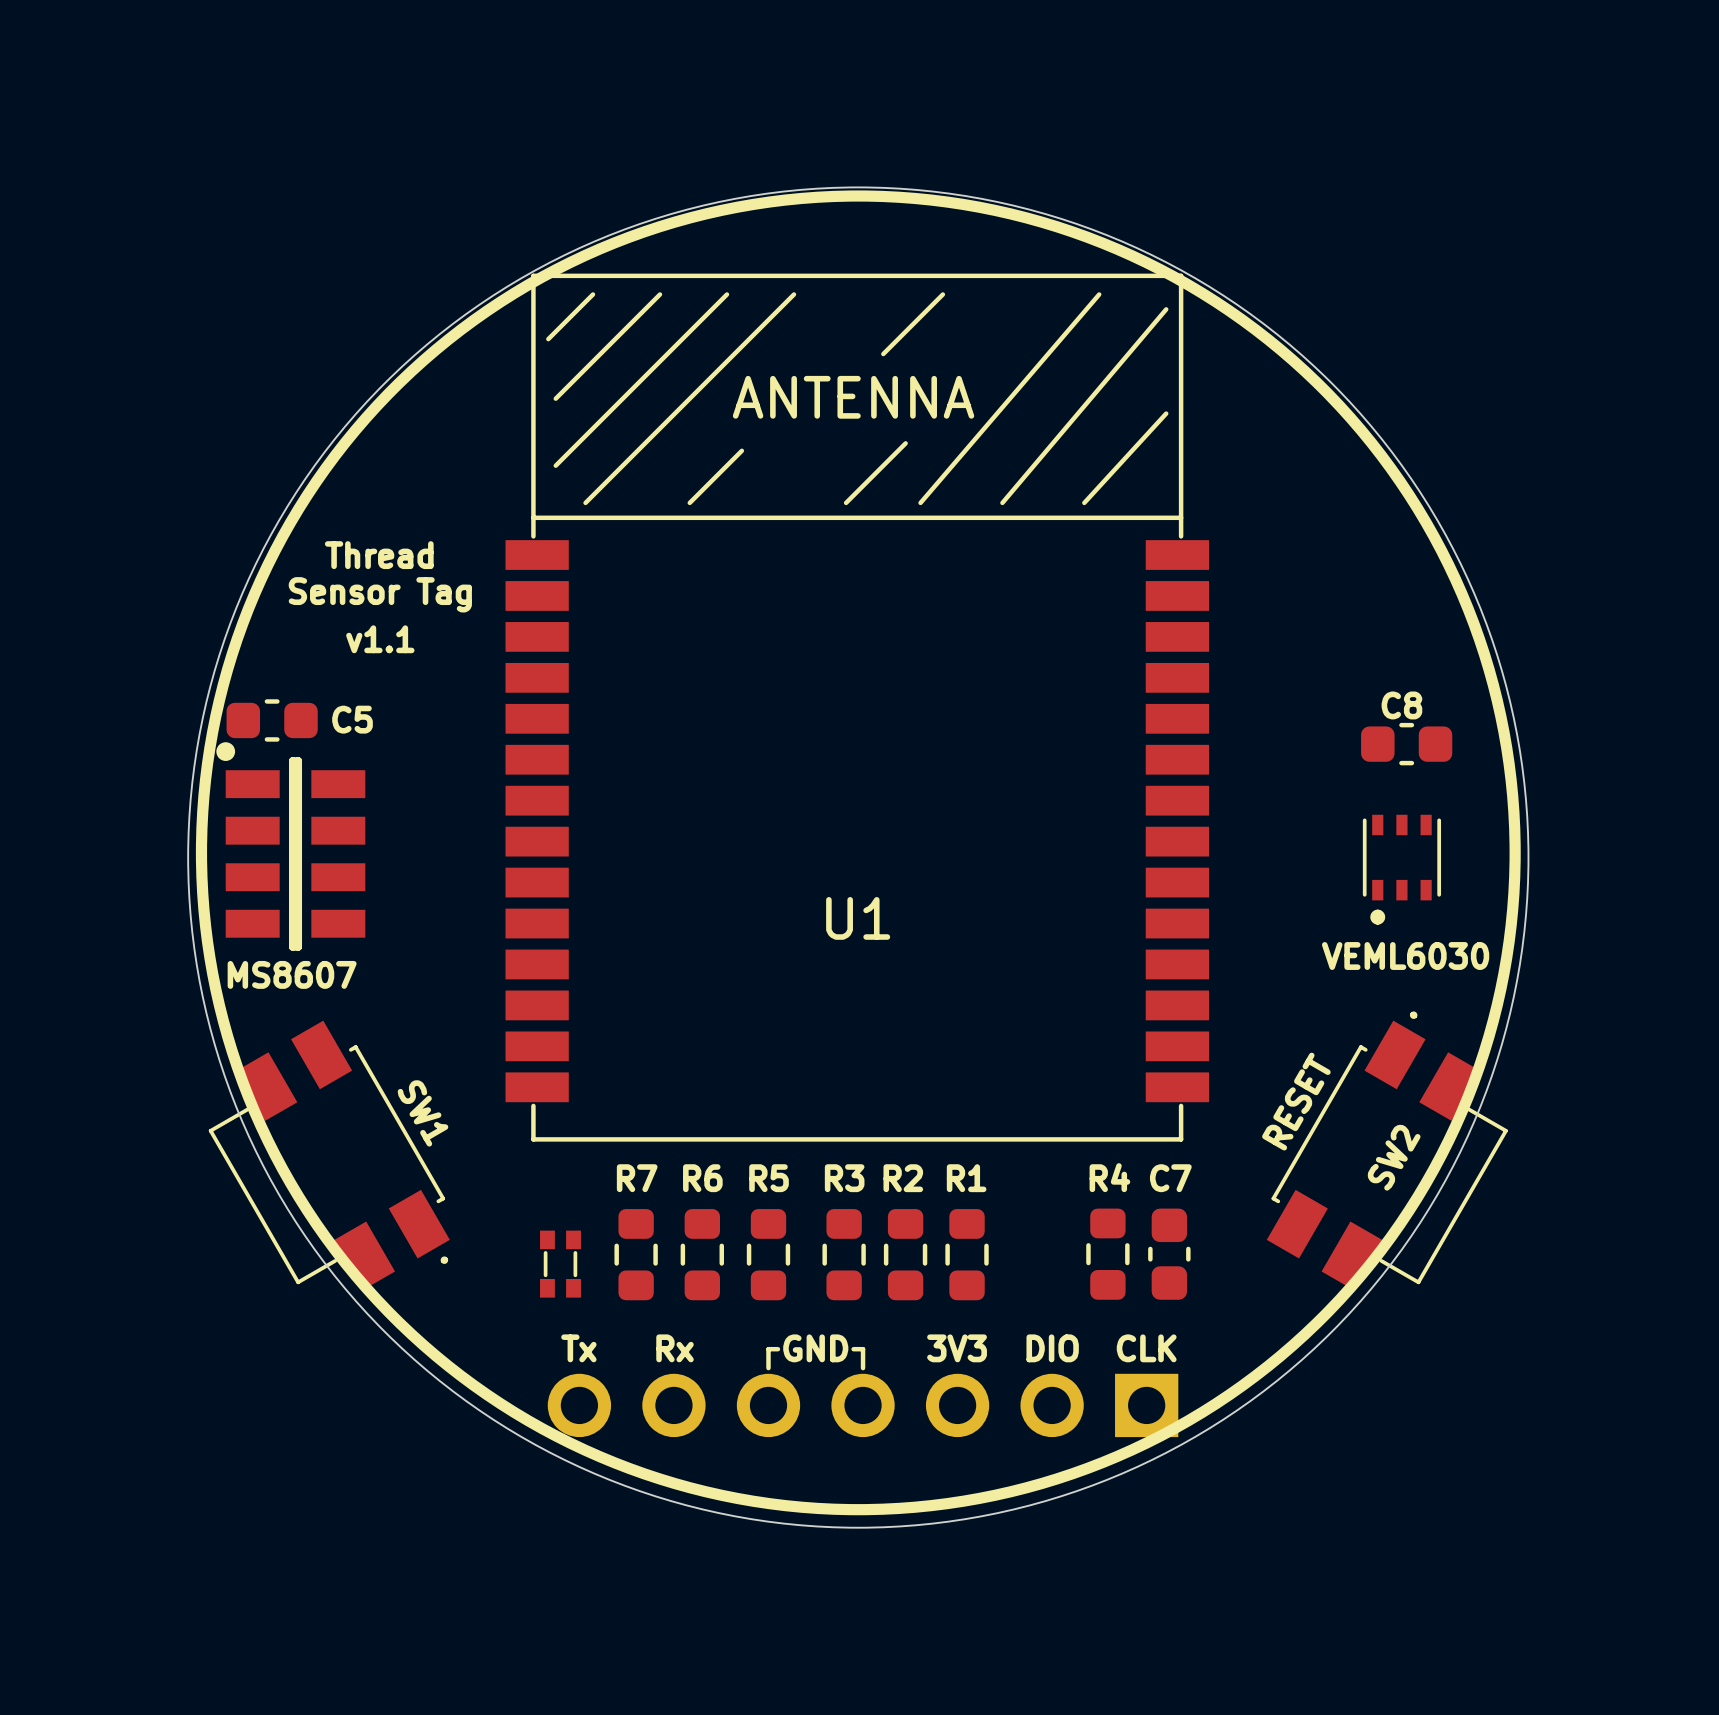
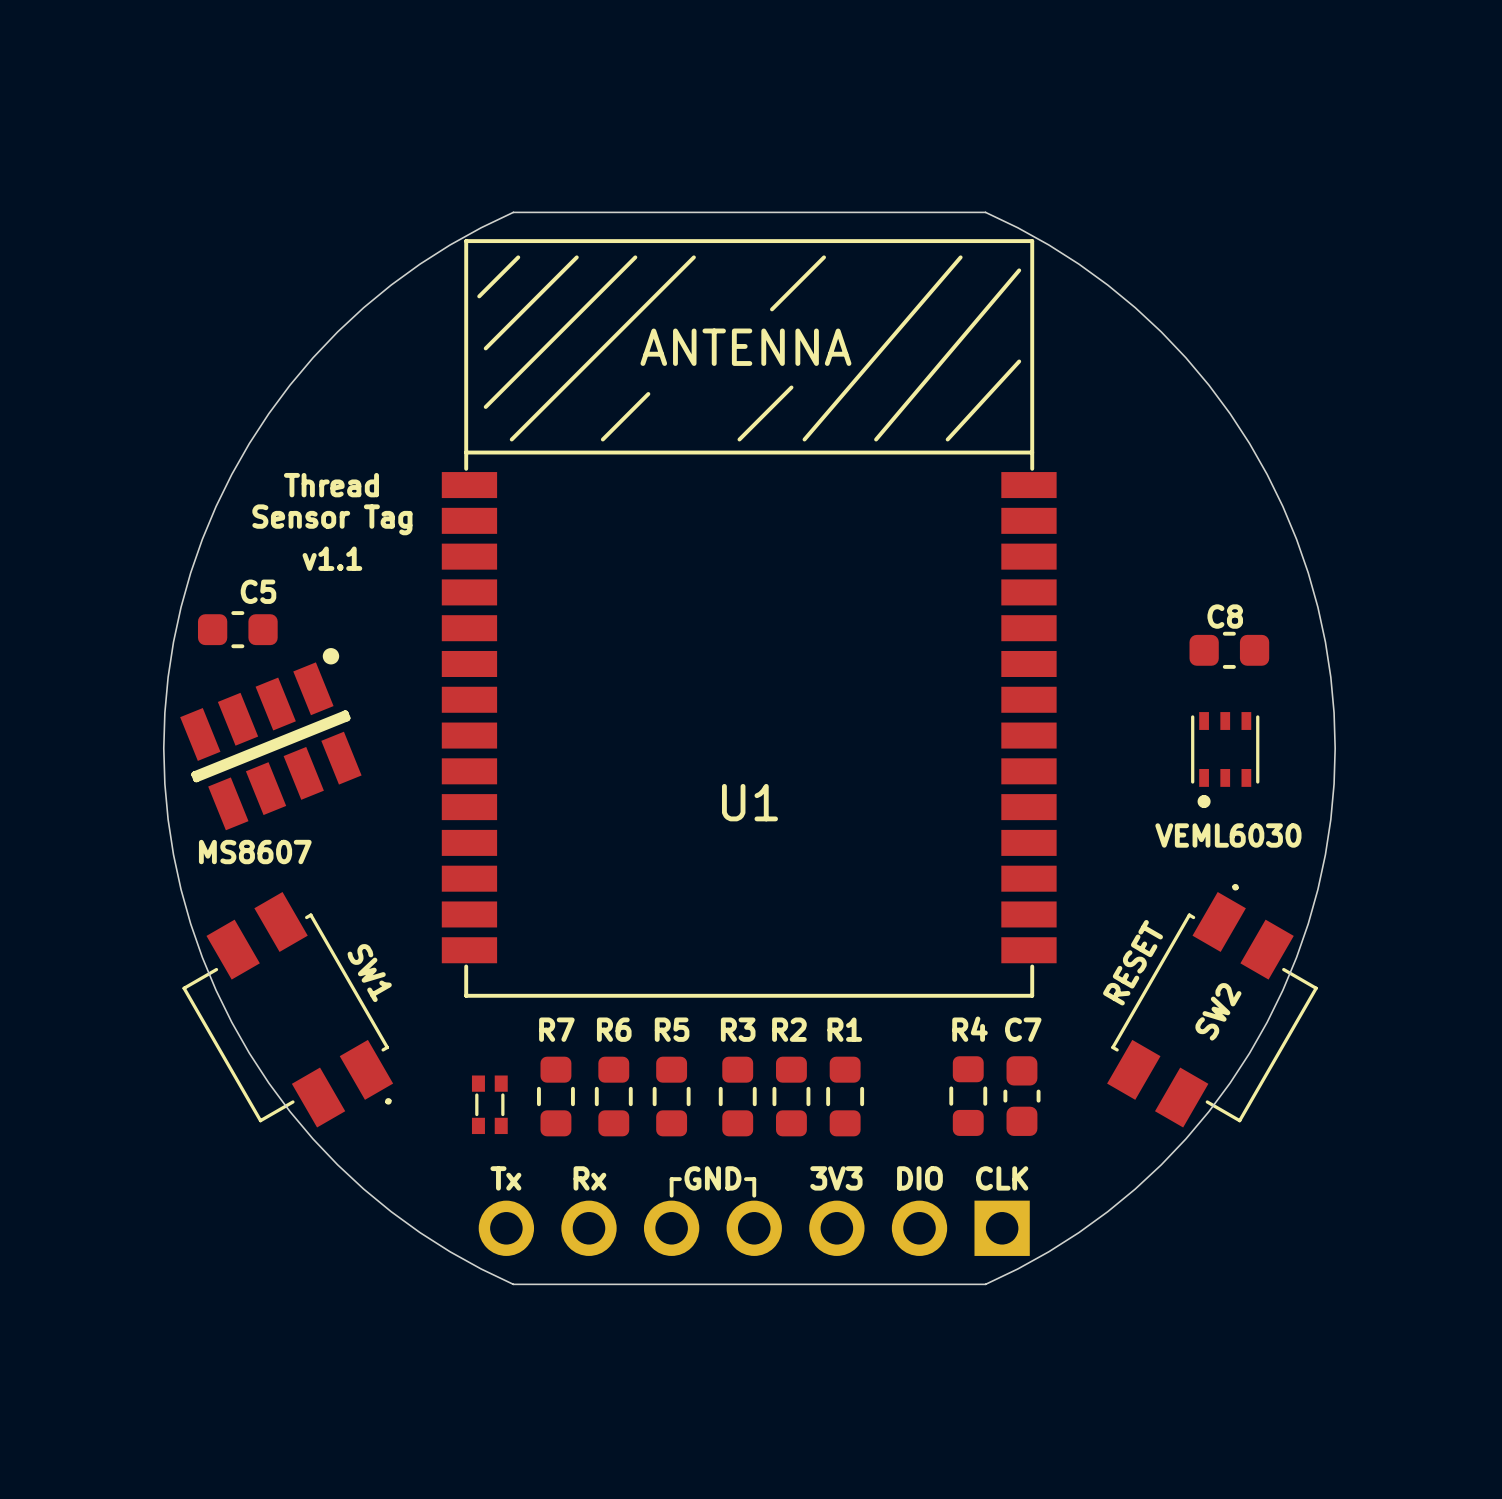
round board edge: [187, 186, 1530, 1529] -> none
drawing: [195, 190, 1521, 1516] -> none
board edge: none -> (513, 212) (985, 212) (1017, 227) (1078, 264) (1135, 307) (1161, 331) (1185, 357) (1230, 413) (1267, 474) (1282, 506) (1308, 572) (1317, 607) (1330, 677) (1334, 712) (1334, 783) (1330, 819) (1317, 889) (1296, 957) (1282, 990) (1249, 1053) (1208, 1111) (1185, 1138) (1135, 1189) (1078, 1232) (1017, 1269) (985, 1284) (513, 1284) (450, 1251) (419, 1232) (391, 1211) (337, 1164) (313, 1138) (268, 1083) (249, 1053) (216, 990) (190, 923) (181, 889) (168, 819) (164, 783) (164, 712) (173, 642) (181, 607) (202, 539) (216, 506) (249, 443) (268, 413) (313, 357) (363, 307) (419, 264) (481, 227) (513, 212)
C5 name position: C5 (352, 719) -> C5 (258, 591)
part rotation: 0° (290, 846) -> 68° clockwise (270, 739)

